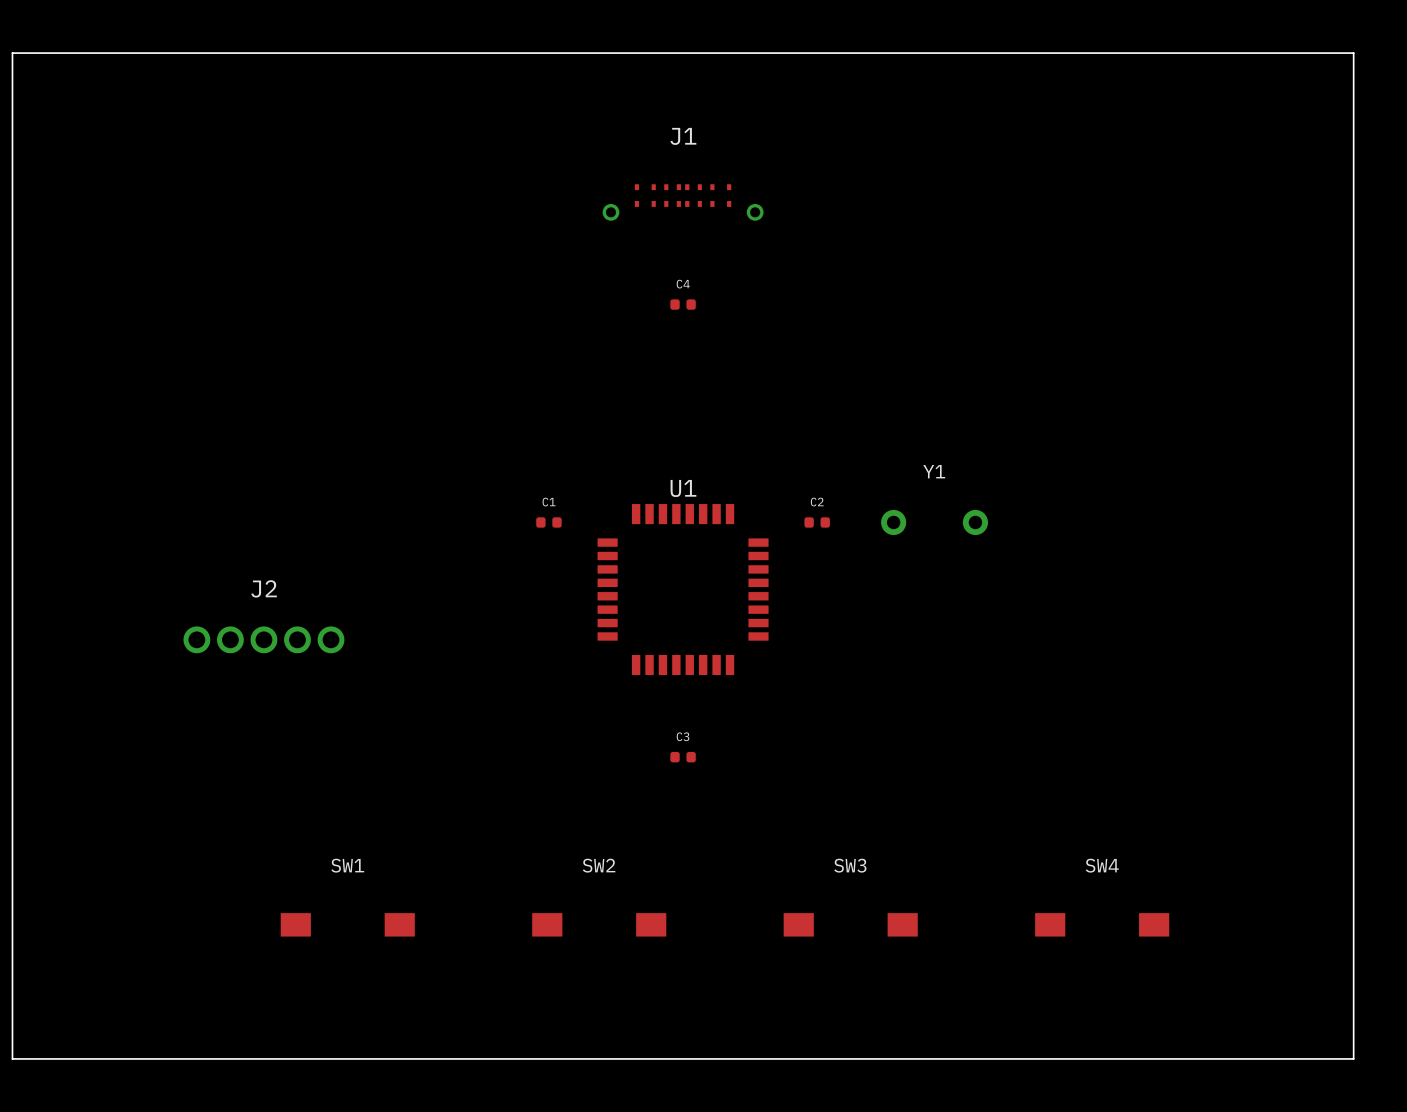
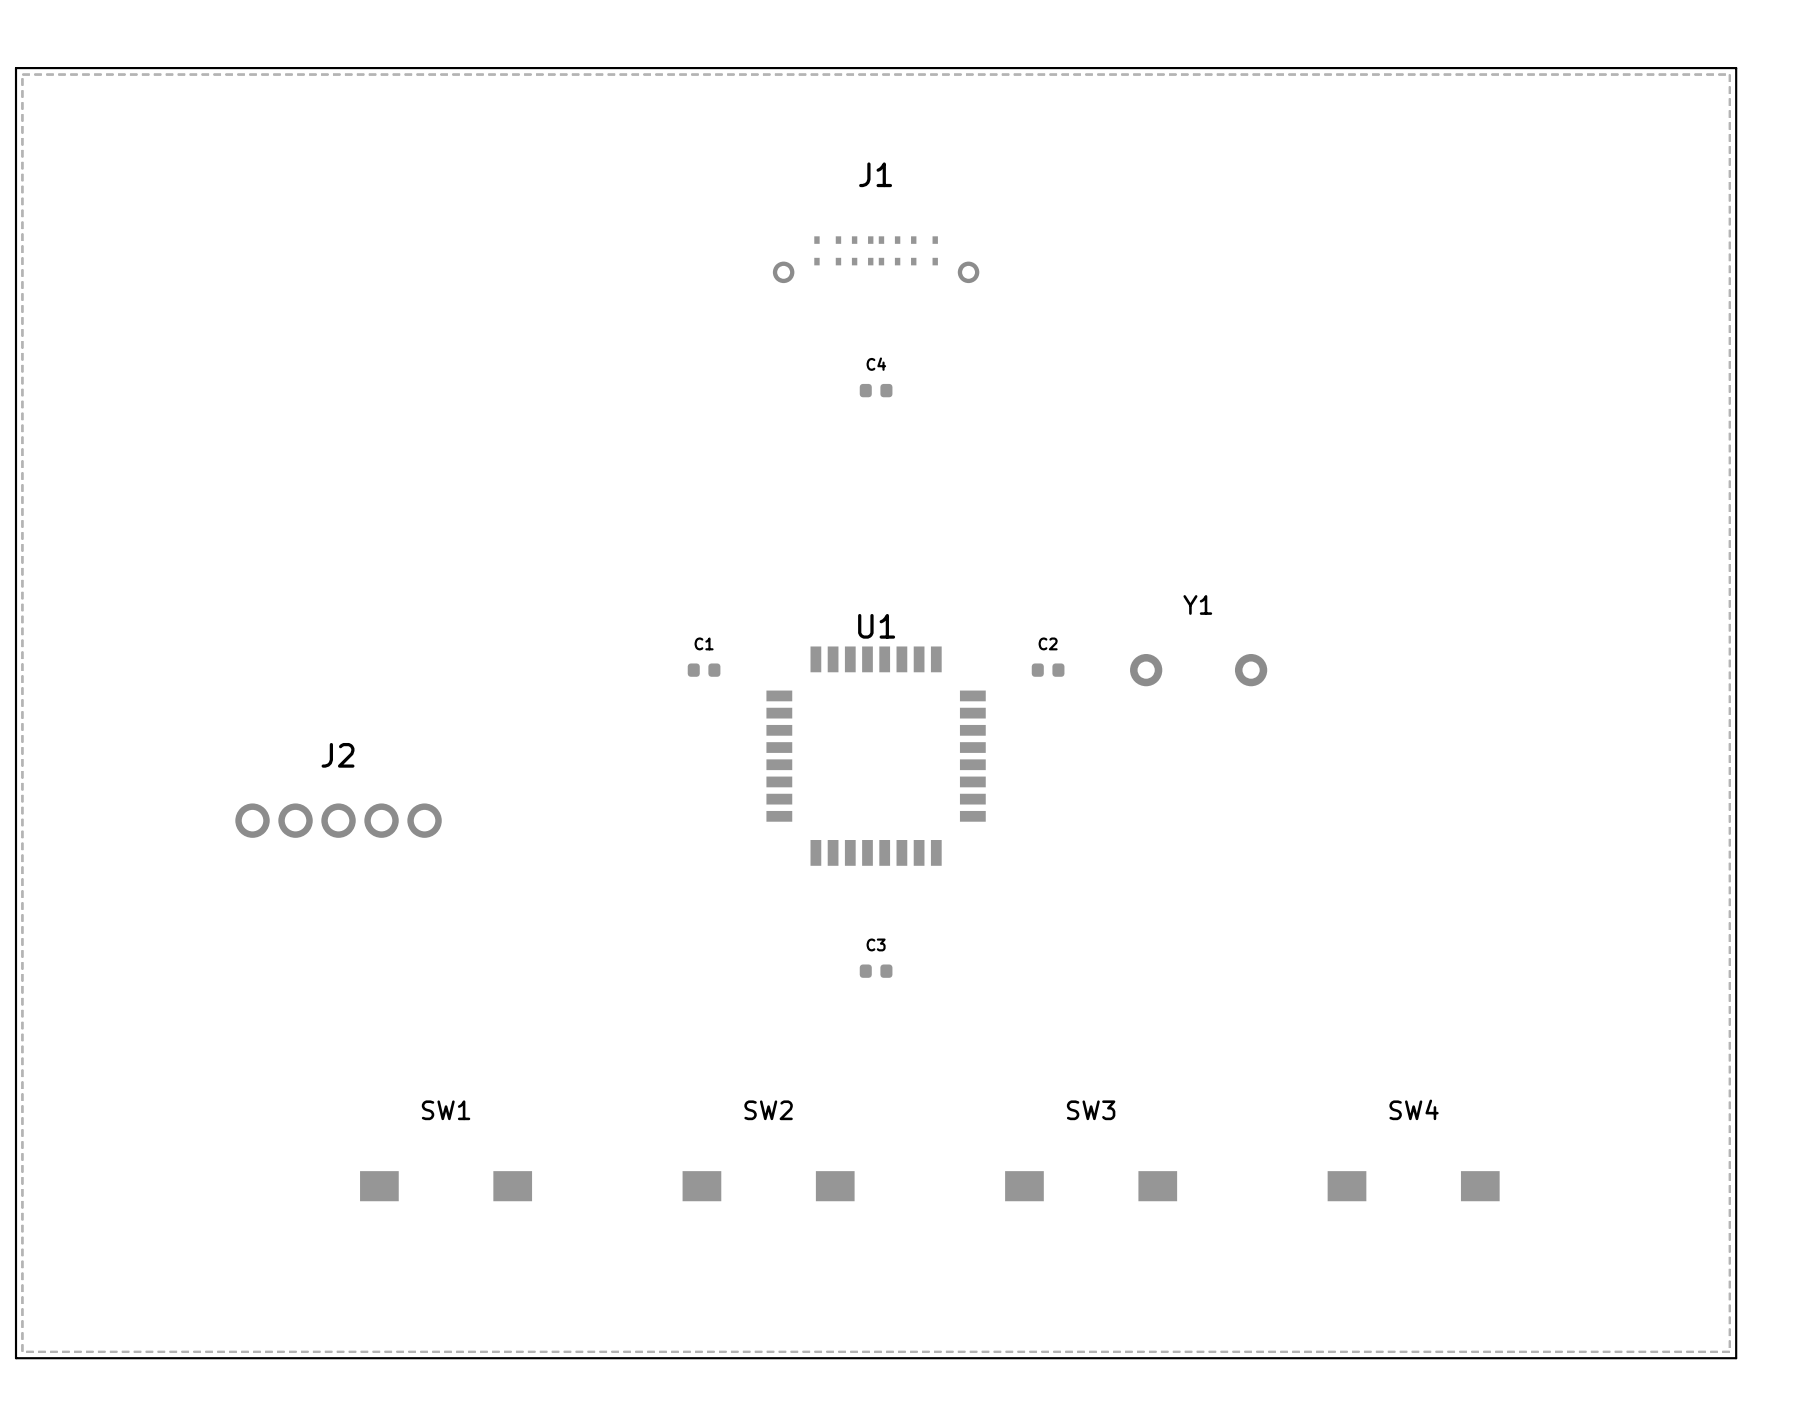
zone outline: none -> (22, 74) (1729, 74) (1729, 1351) (22, 1351) (22, 74)

